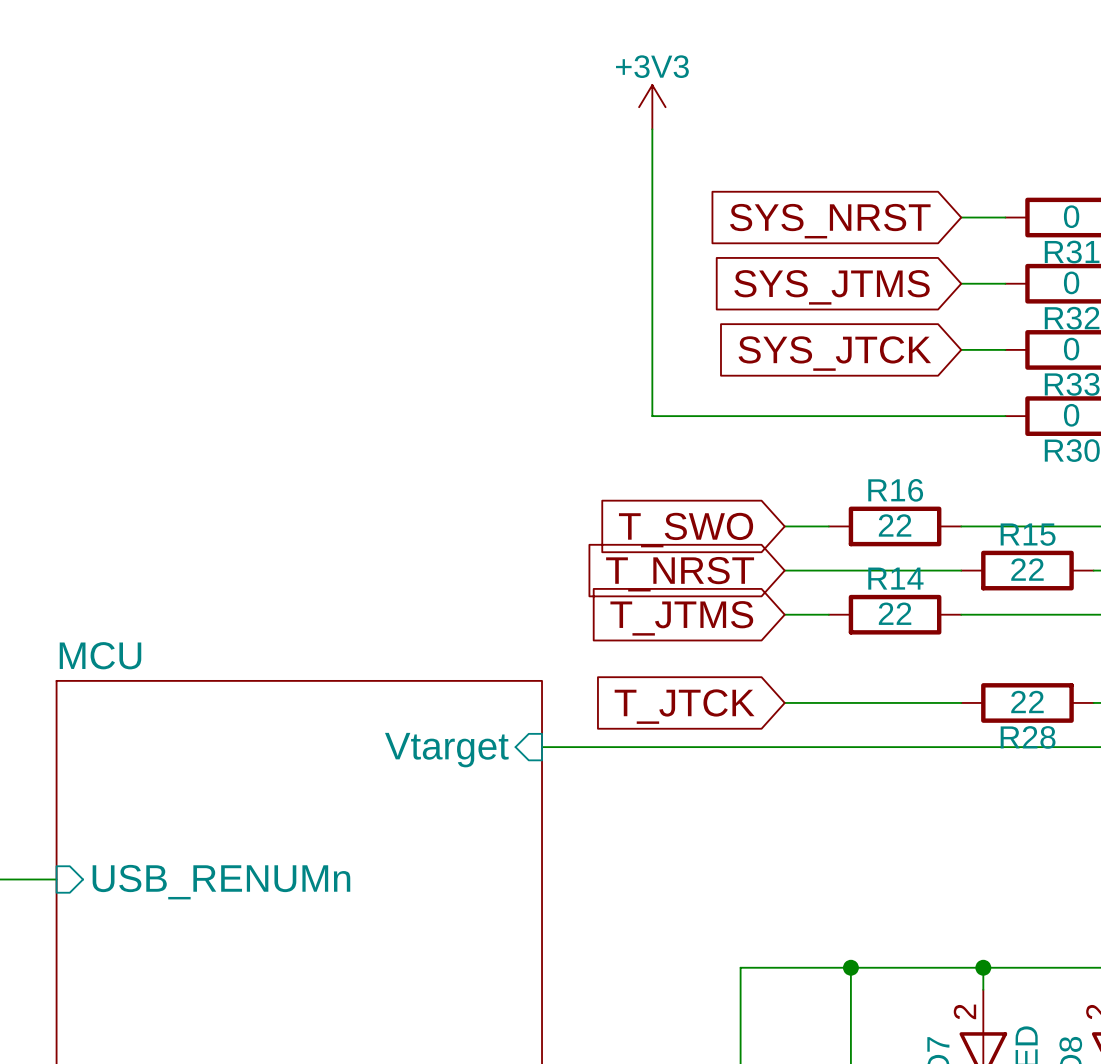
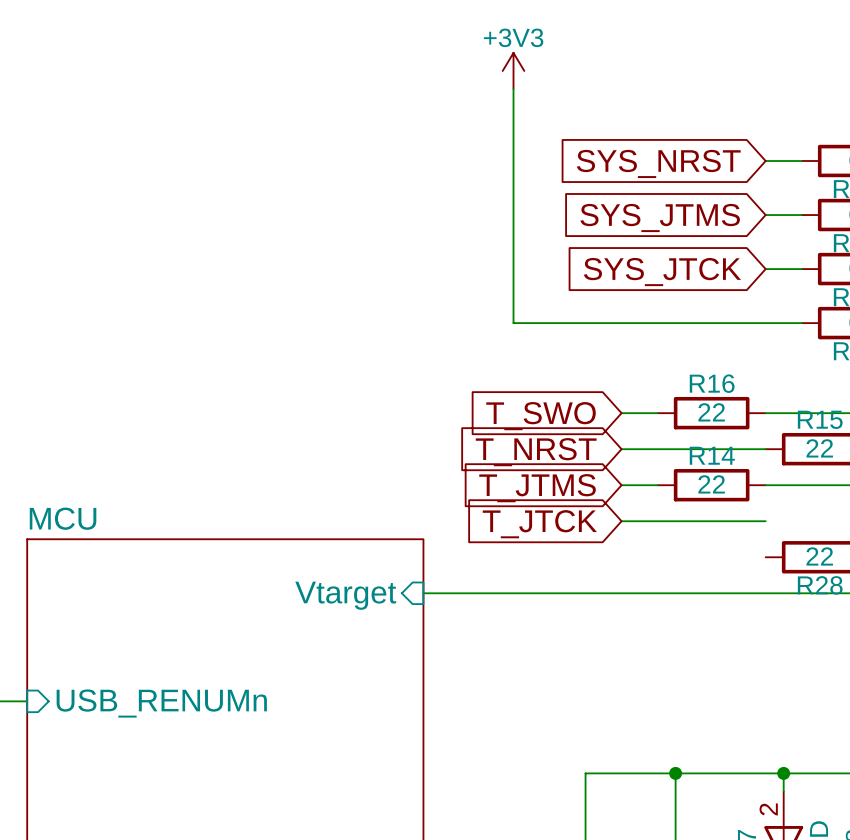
wire: (784, 702) (961, 702) -> (621, 521) (765, 521)
global label position: T_JTCK (684, 706) -> T_JTCK (539, 524)

